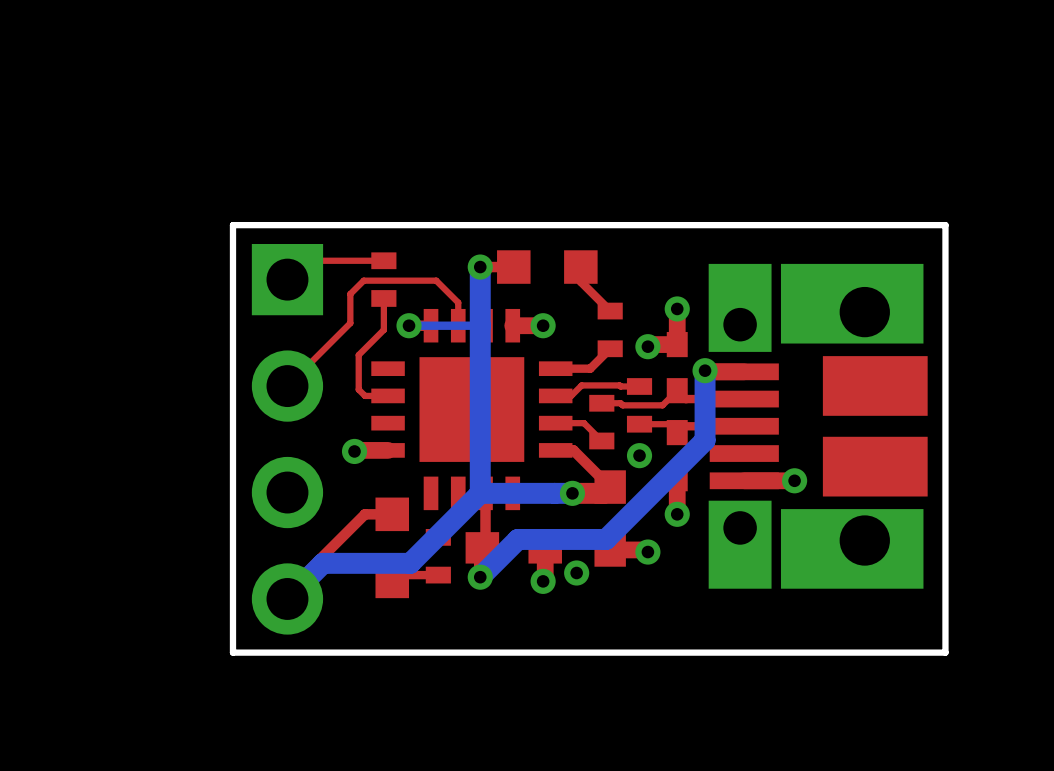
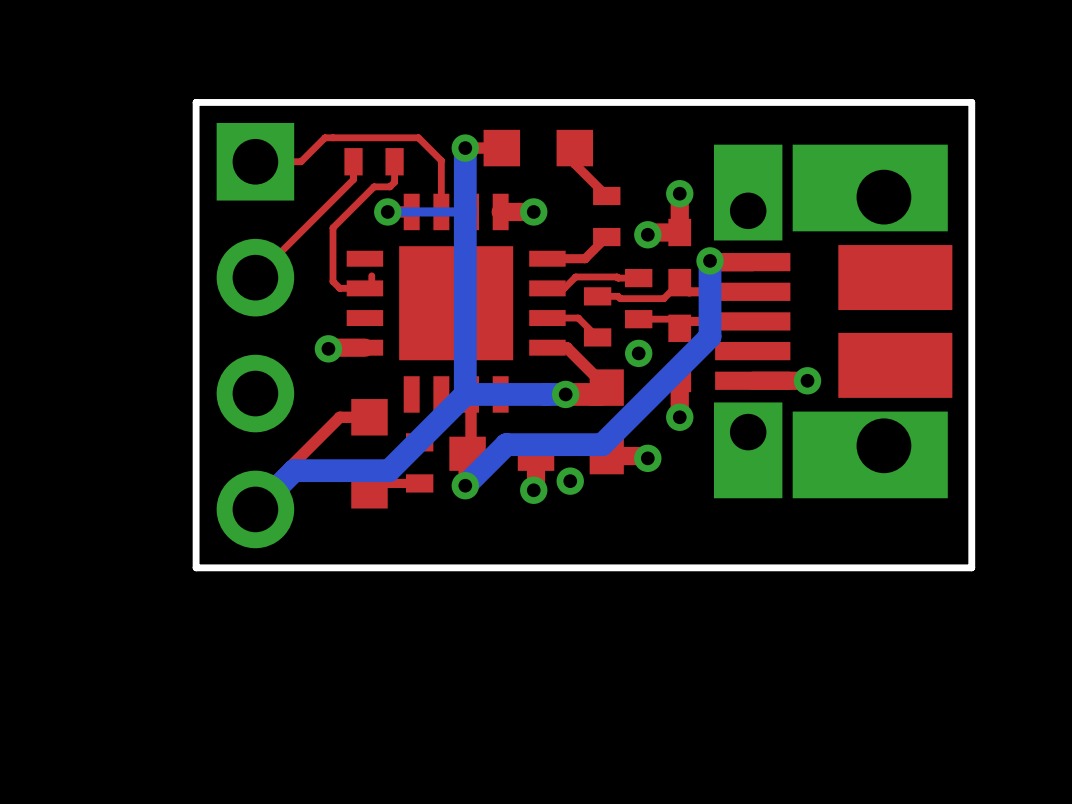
top track: (383, 260) (306, 260) -> none
top track: none -> (353, 161) (353, 179) (323, 209)
part rotation: 0° (383, 279) -> 90° clockwise (374, 161)
top track: (383, 298) (383, 329) (358, 355) -> (394, 161) (394, 182) (390, 186) (374, 186) (332, 227) (332, 243)
top track: (458, 302) (436, 280) (363, 280) (350, 294) (350, 323) -> (441, 186) (441, 160) (418, 137) (325, 137) (301, 161) (255, 161)
top track: none -> (371, 275) (371, 280)

